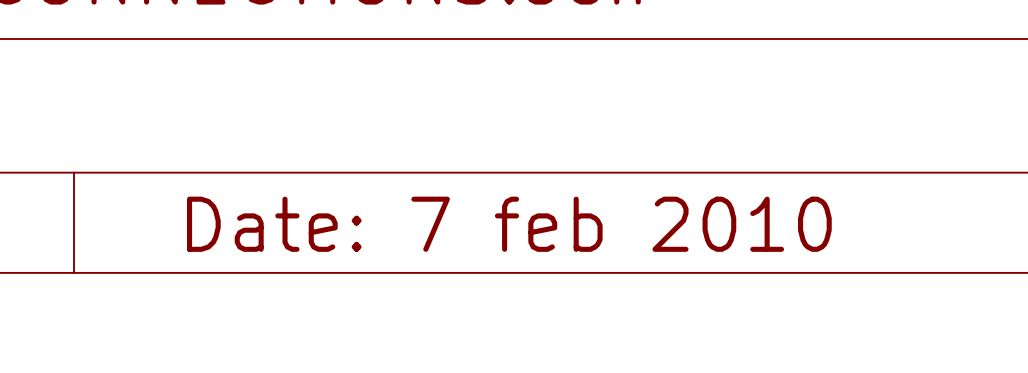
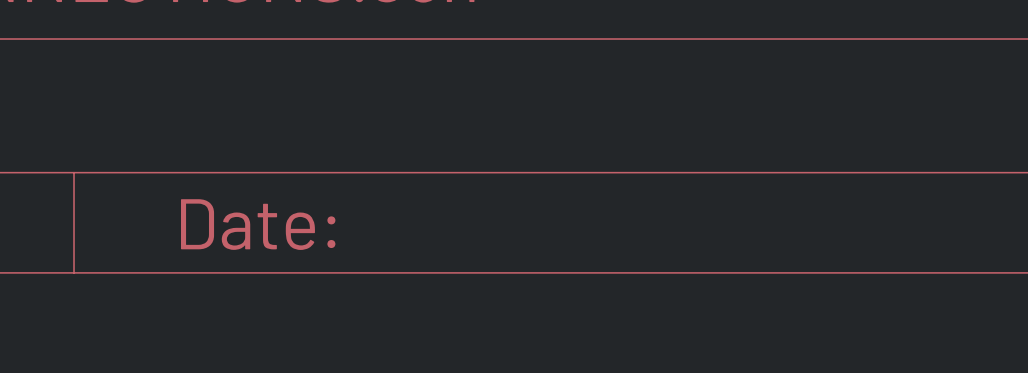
title block: Date: 7 feb 2010 (509, 224) -> Date: (258, 224)

